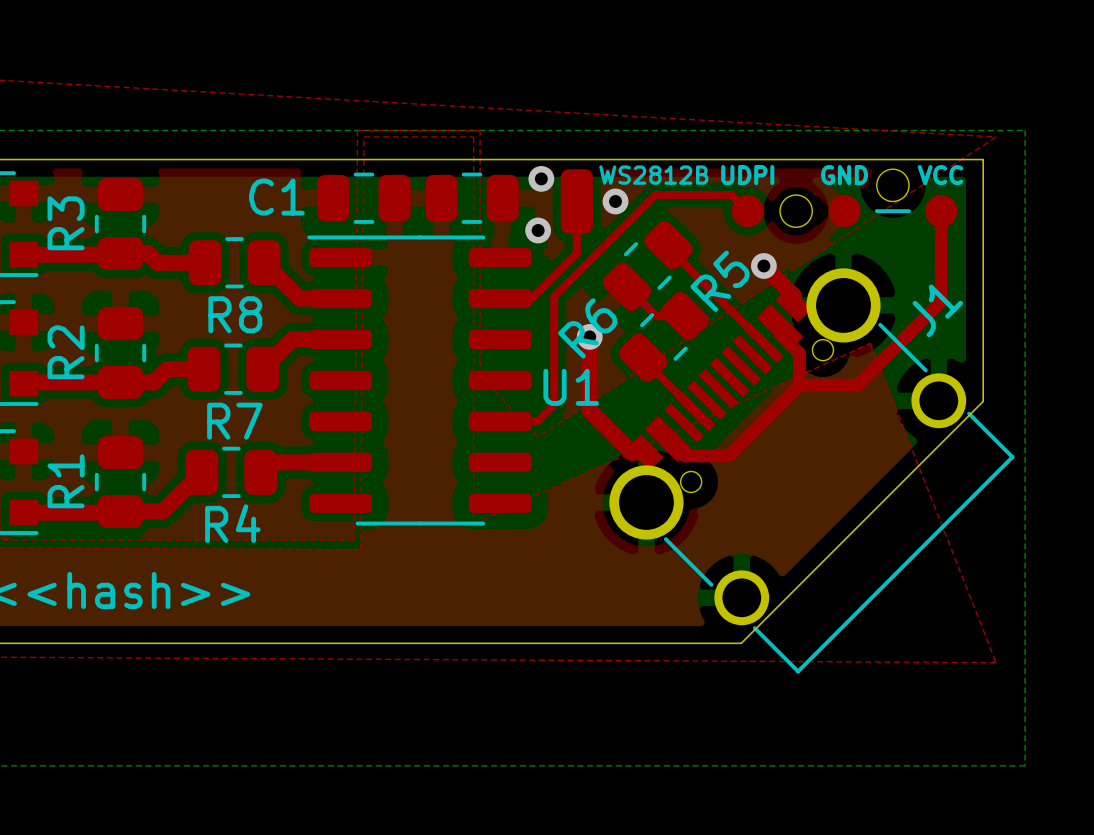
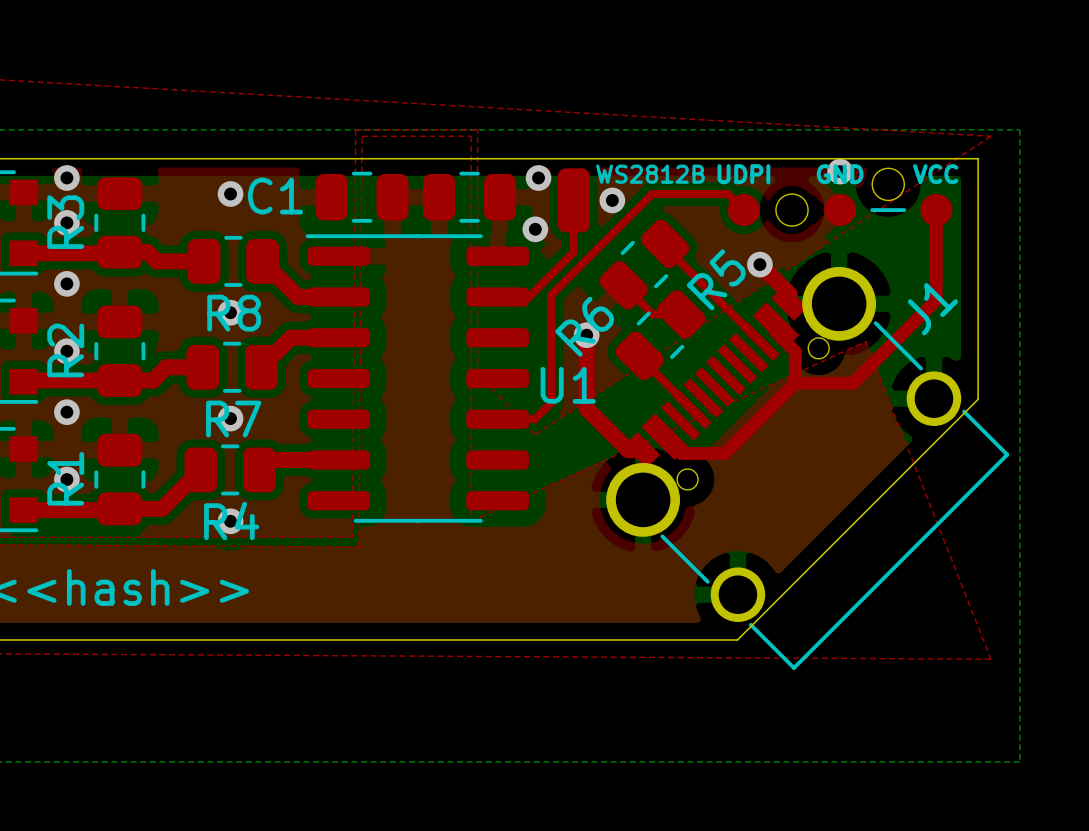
via: none -> (840, 171)
via: none -> (66, 177)
via: none -> (230, 194)
via: none -> (66, 222)
via: none -> (66, 283)
via: none -> (230, 312)
via: none -> (66, 351)
via: none -> (66, 412)
via: none -> (230, 418)
via: none -> (66, 479)
via: none -> (230, 521)

